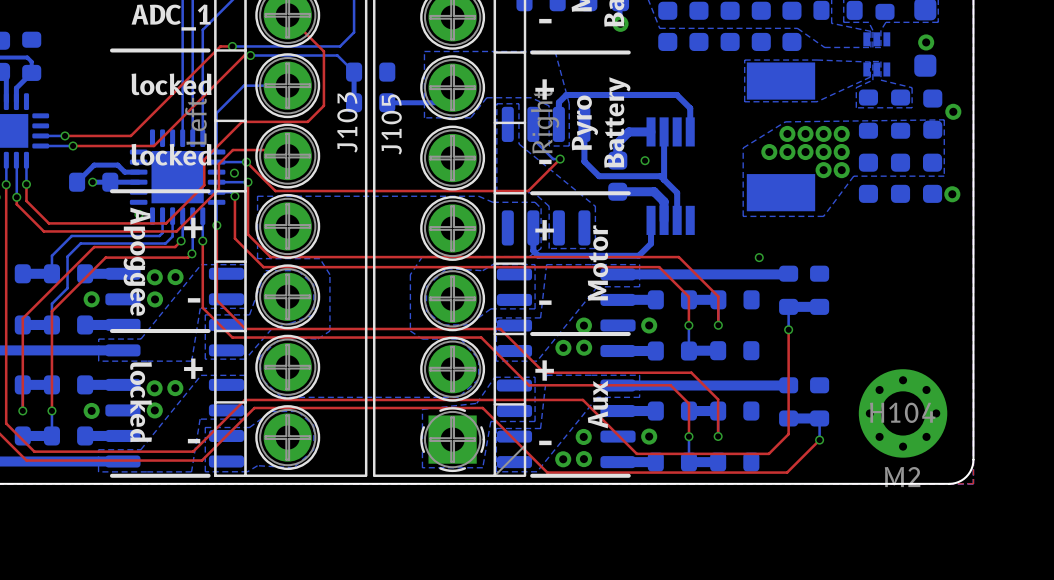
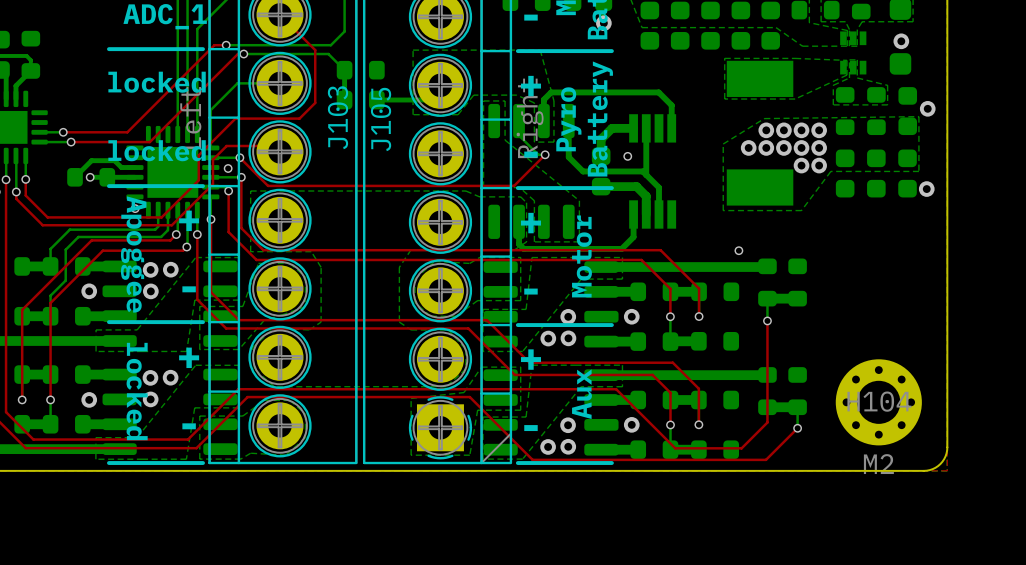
top track: (582, 399) (636, 453) (768, 453) -> (567, 389) (616, 389) (675, 448) (741, 448) (748, 441)

